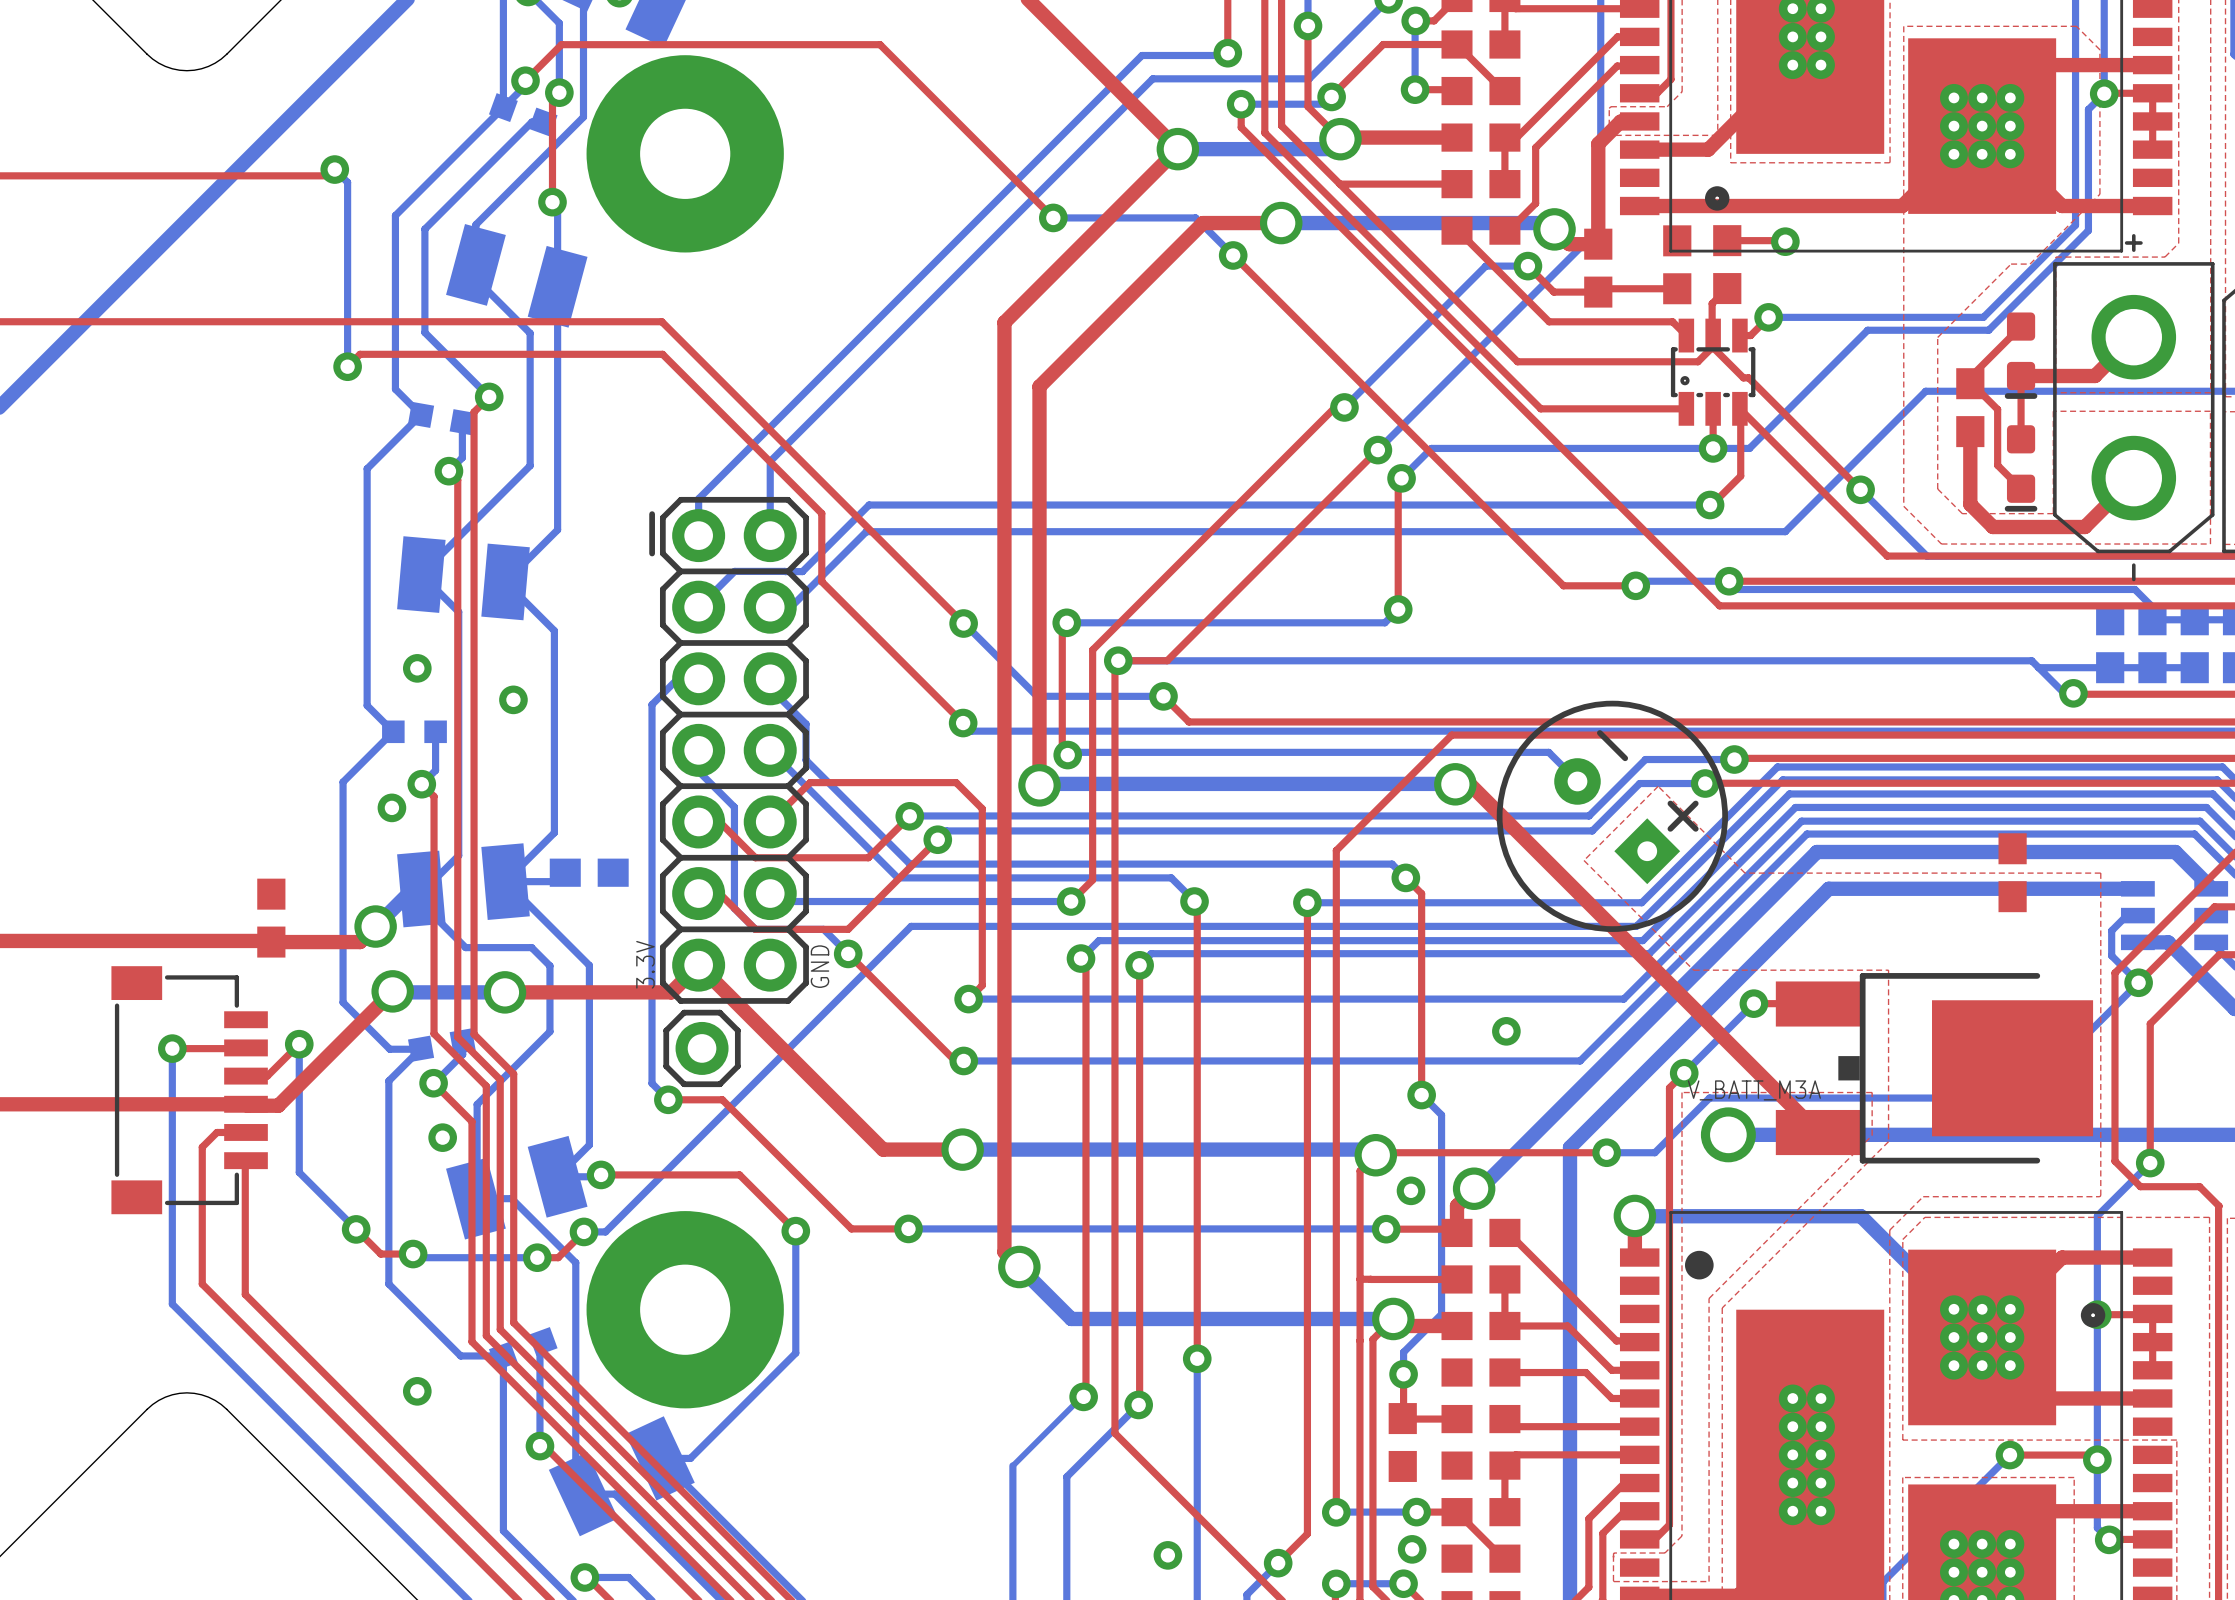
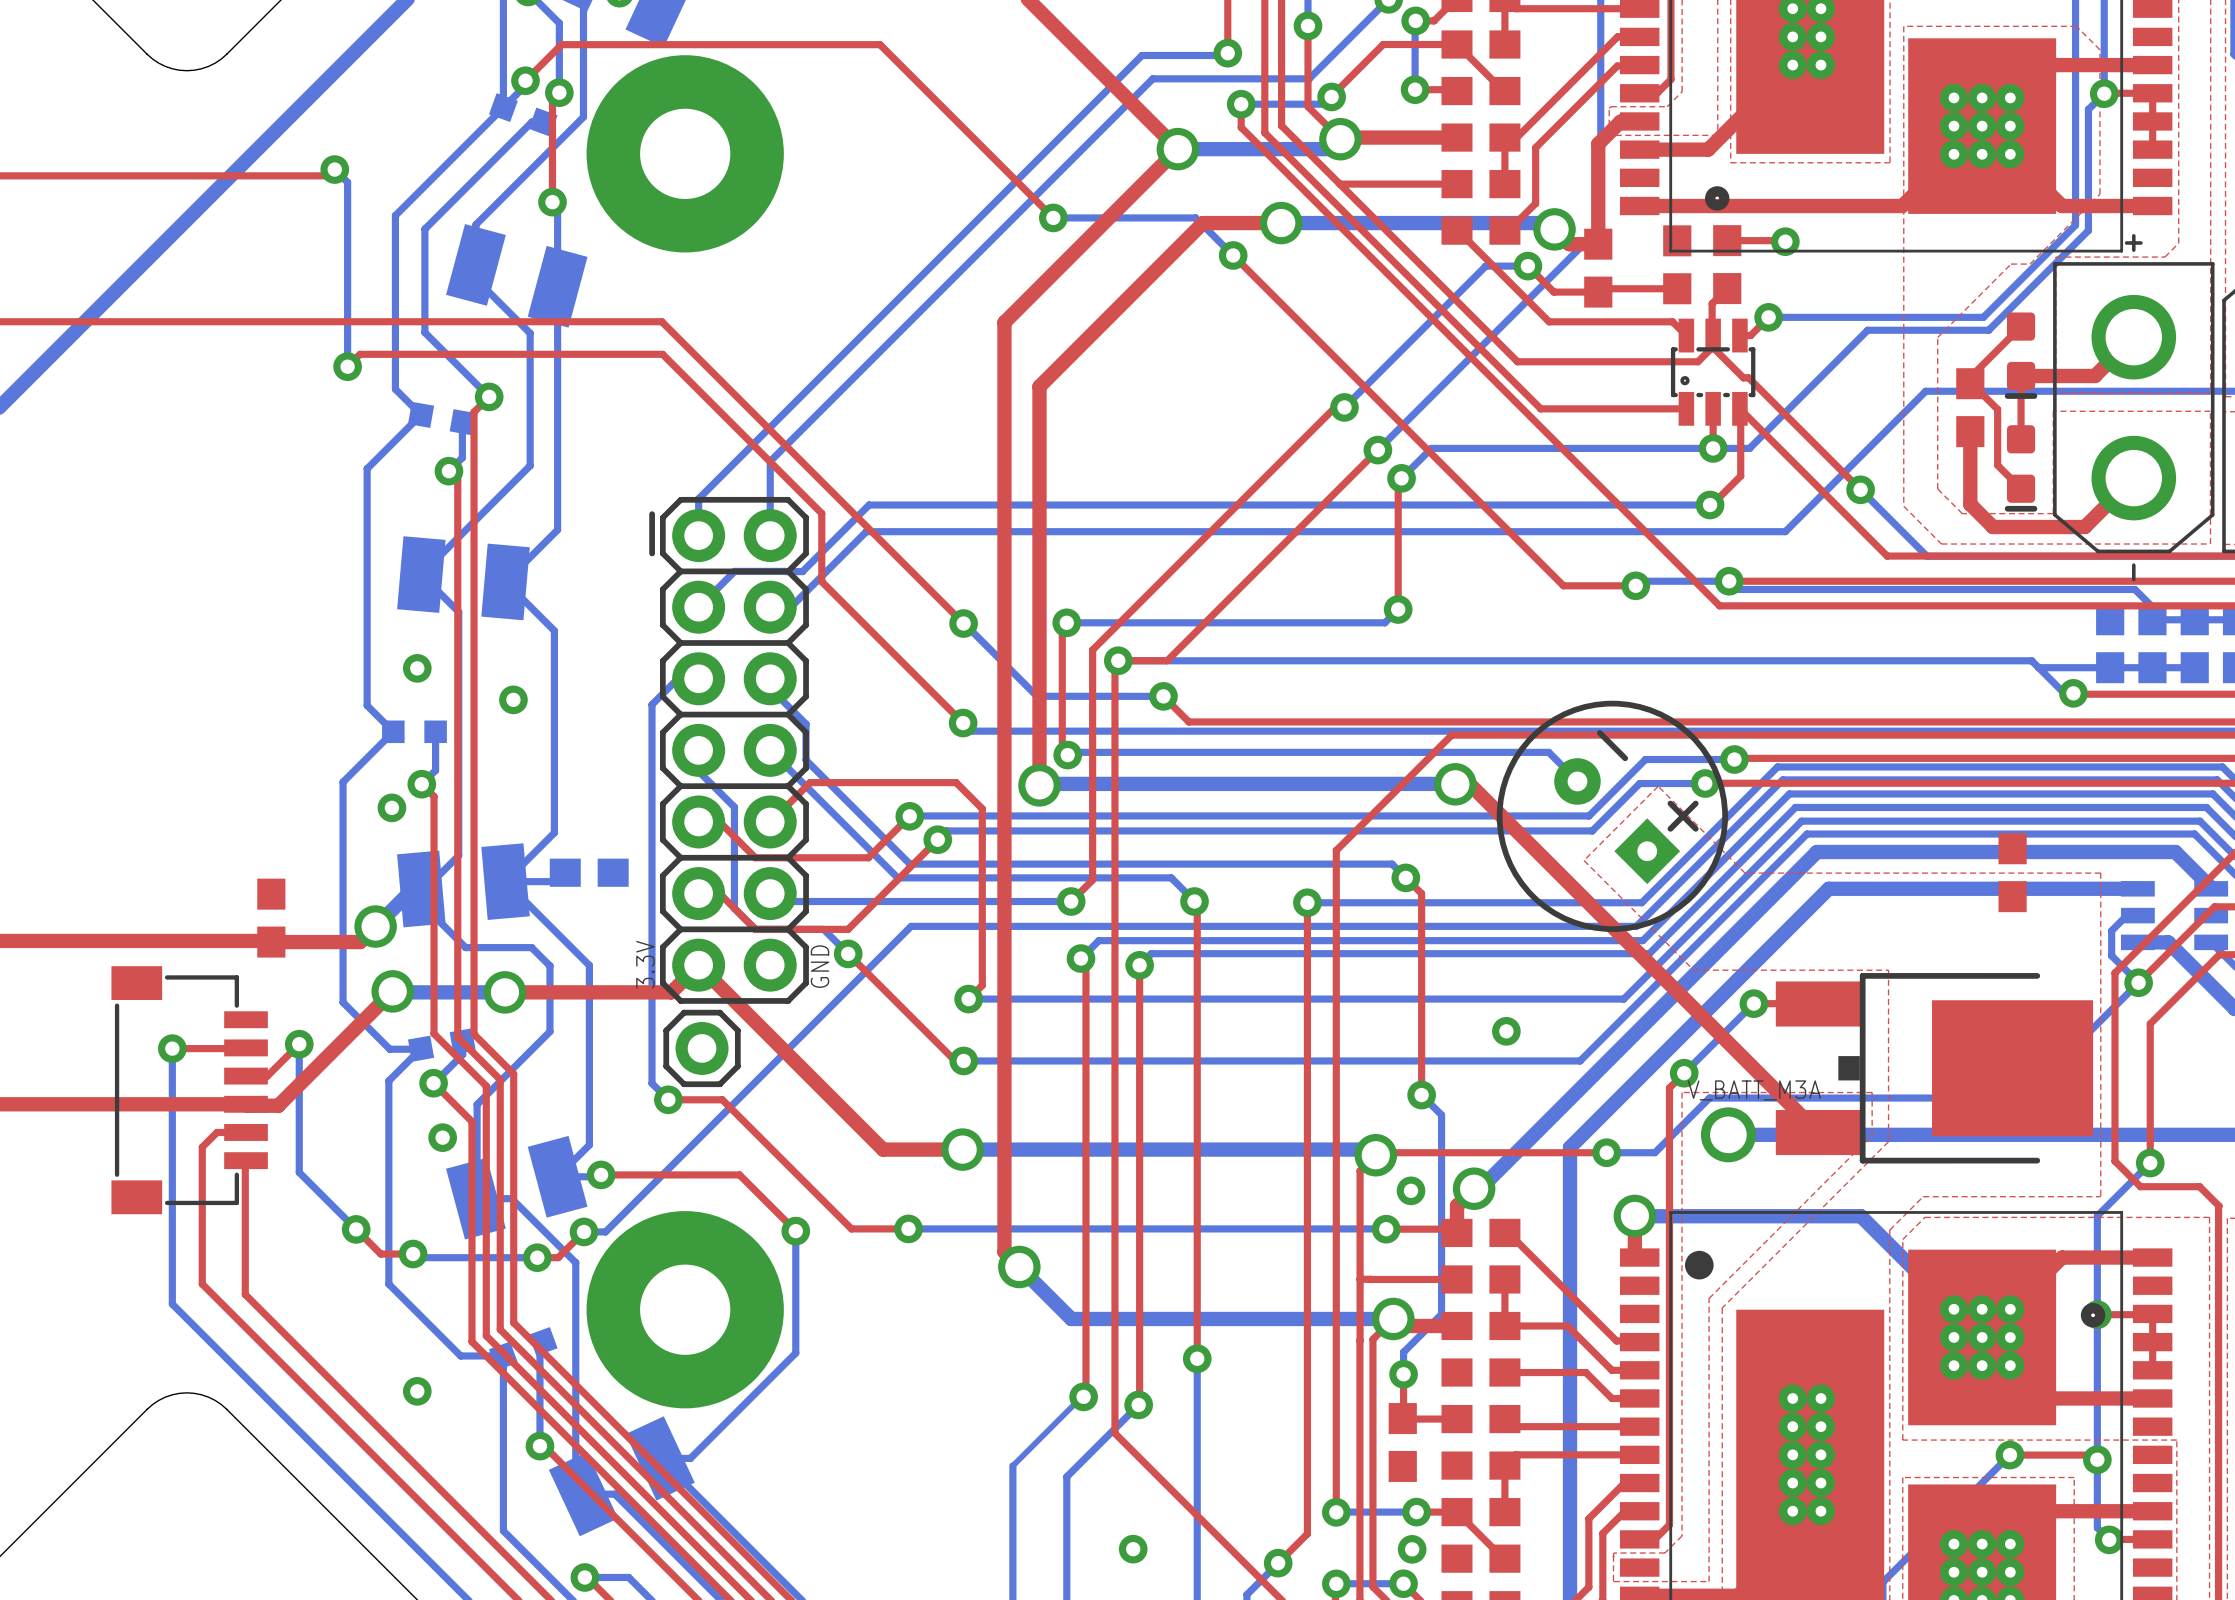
via position: (1167, 1555) -> (1133, 1549)

